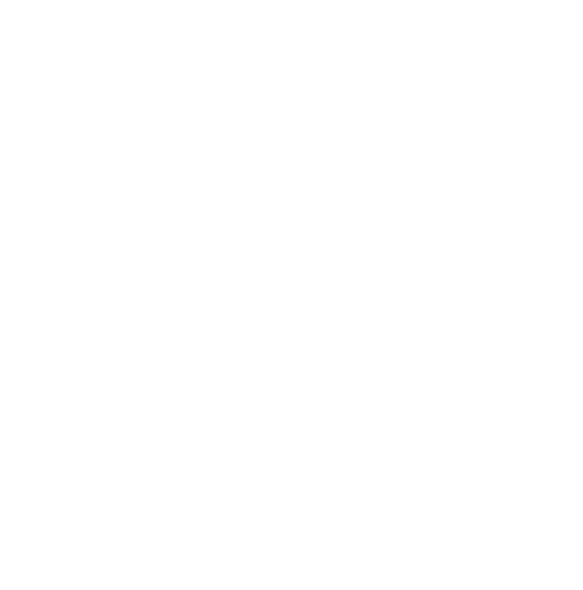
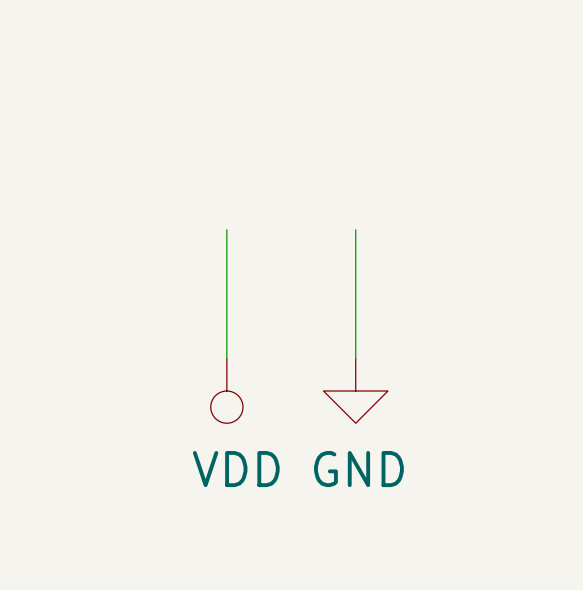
wire: none -> (226, 229) (226, 358)
wire: none -> (355, 229) (355, 358)
power symbol: none -> VDD (226, 391)
power symbol: none -> GND (355, 391)

